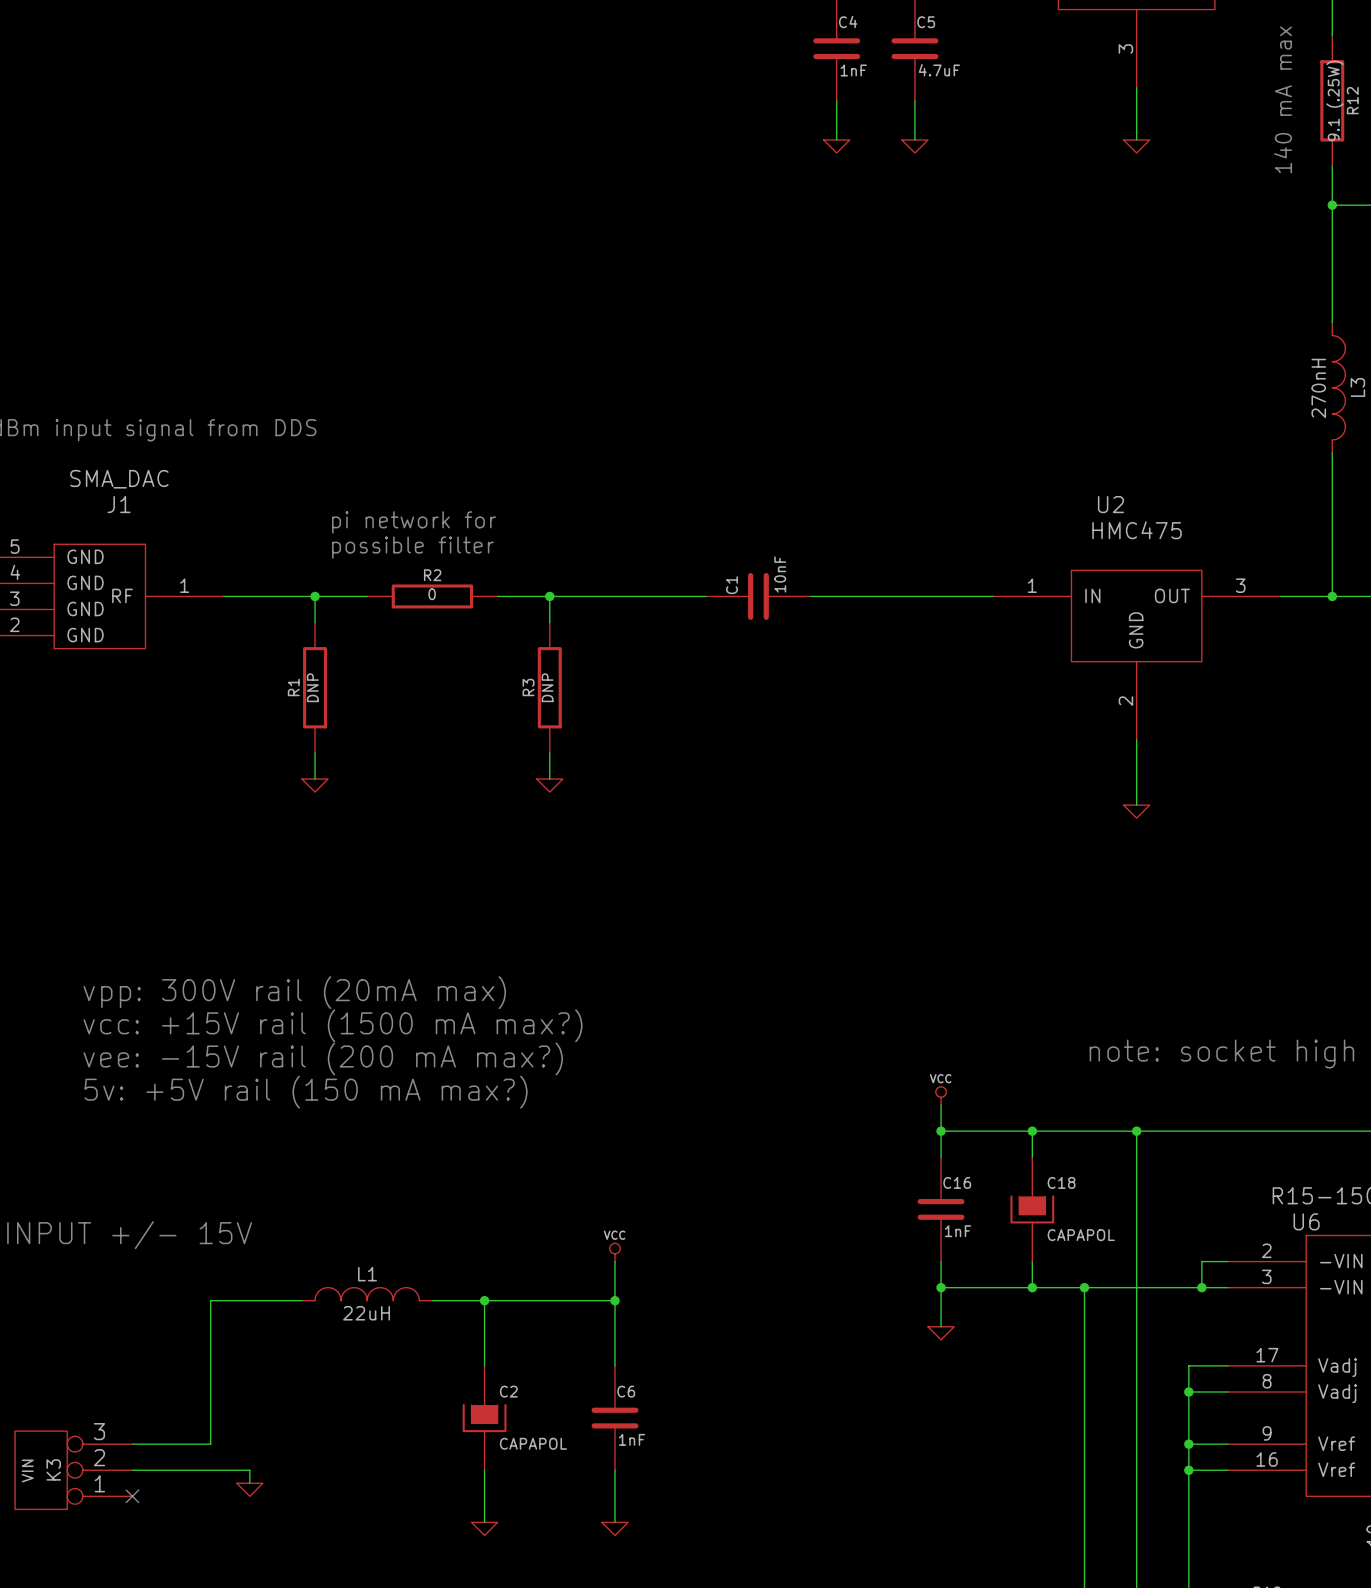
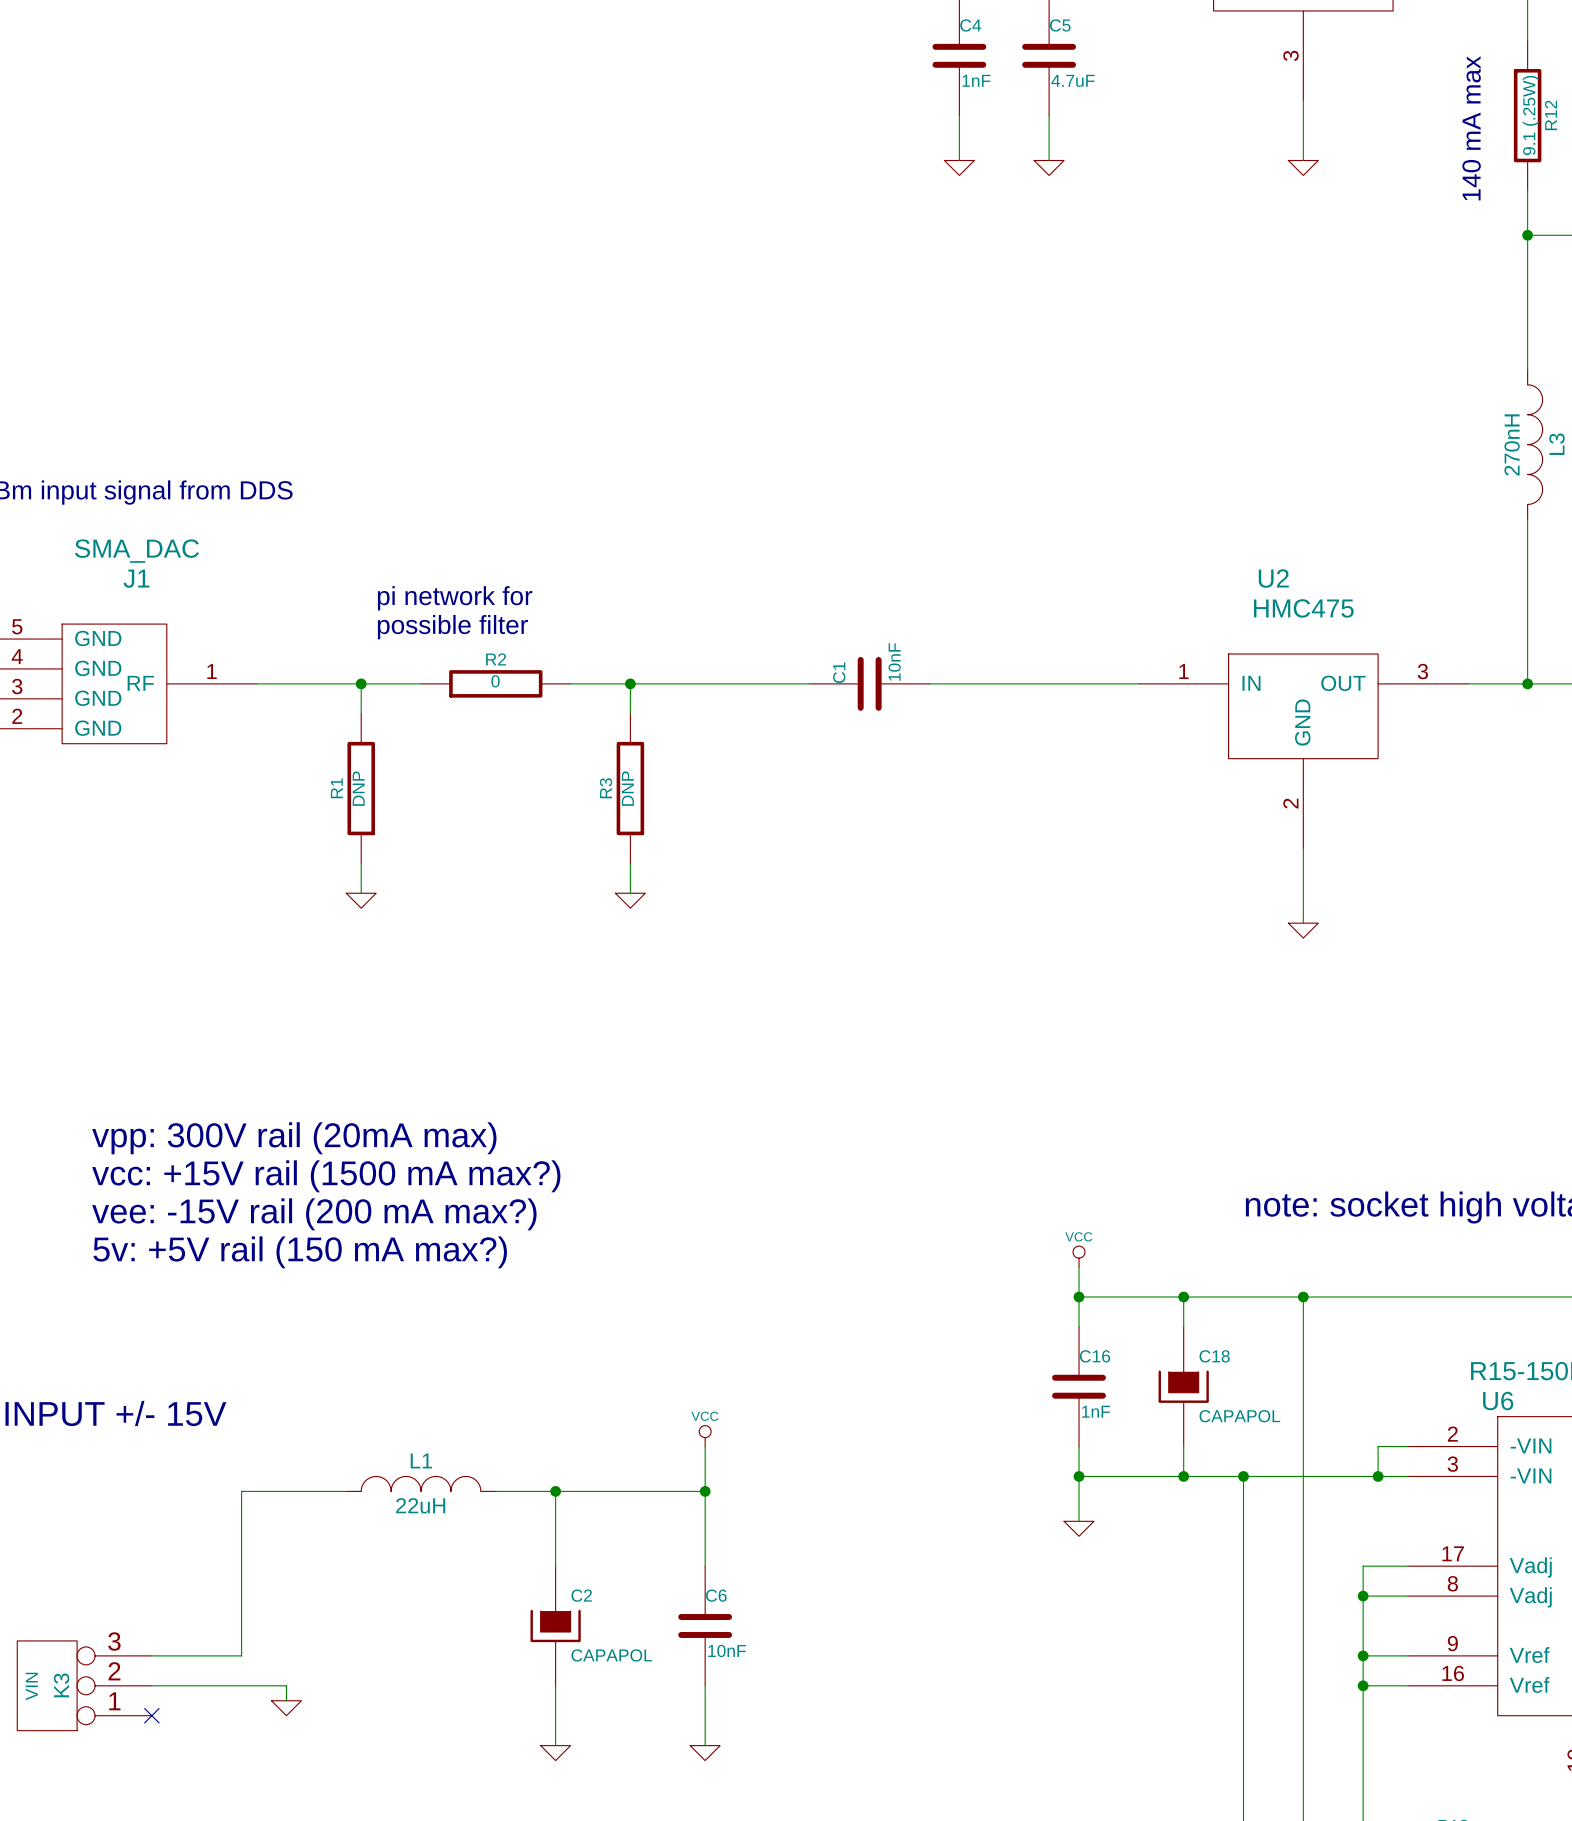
C6 value: 1nF (631, 1439) -> 10nF (727, 1650)

